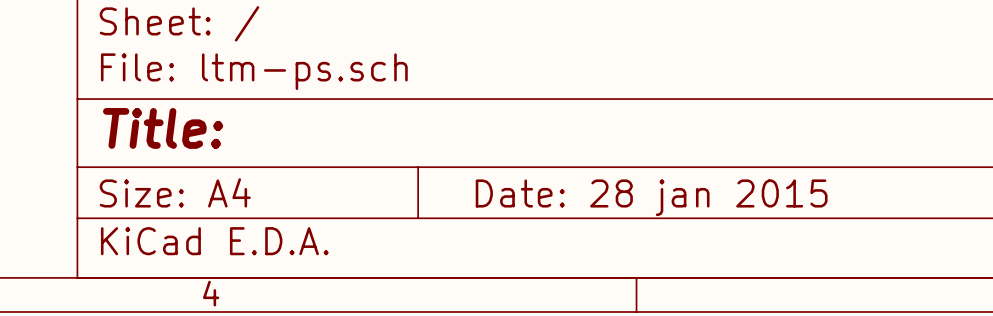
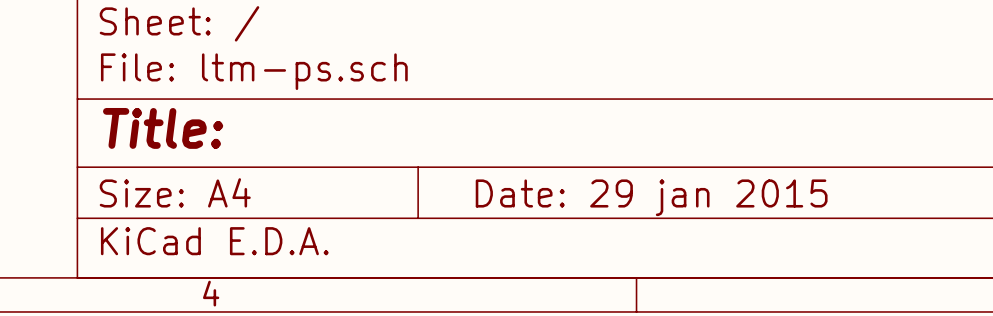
title block: Date: 28 jan 2015 (651, 197) -> Date: 29 jan 2015 (651, 197)

